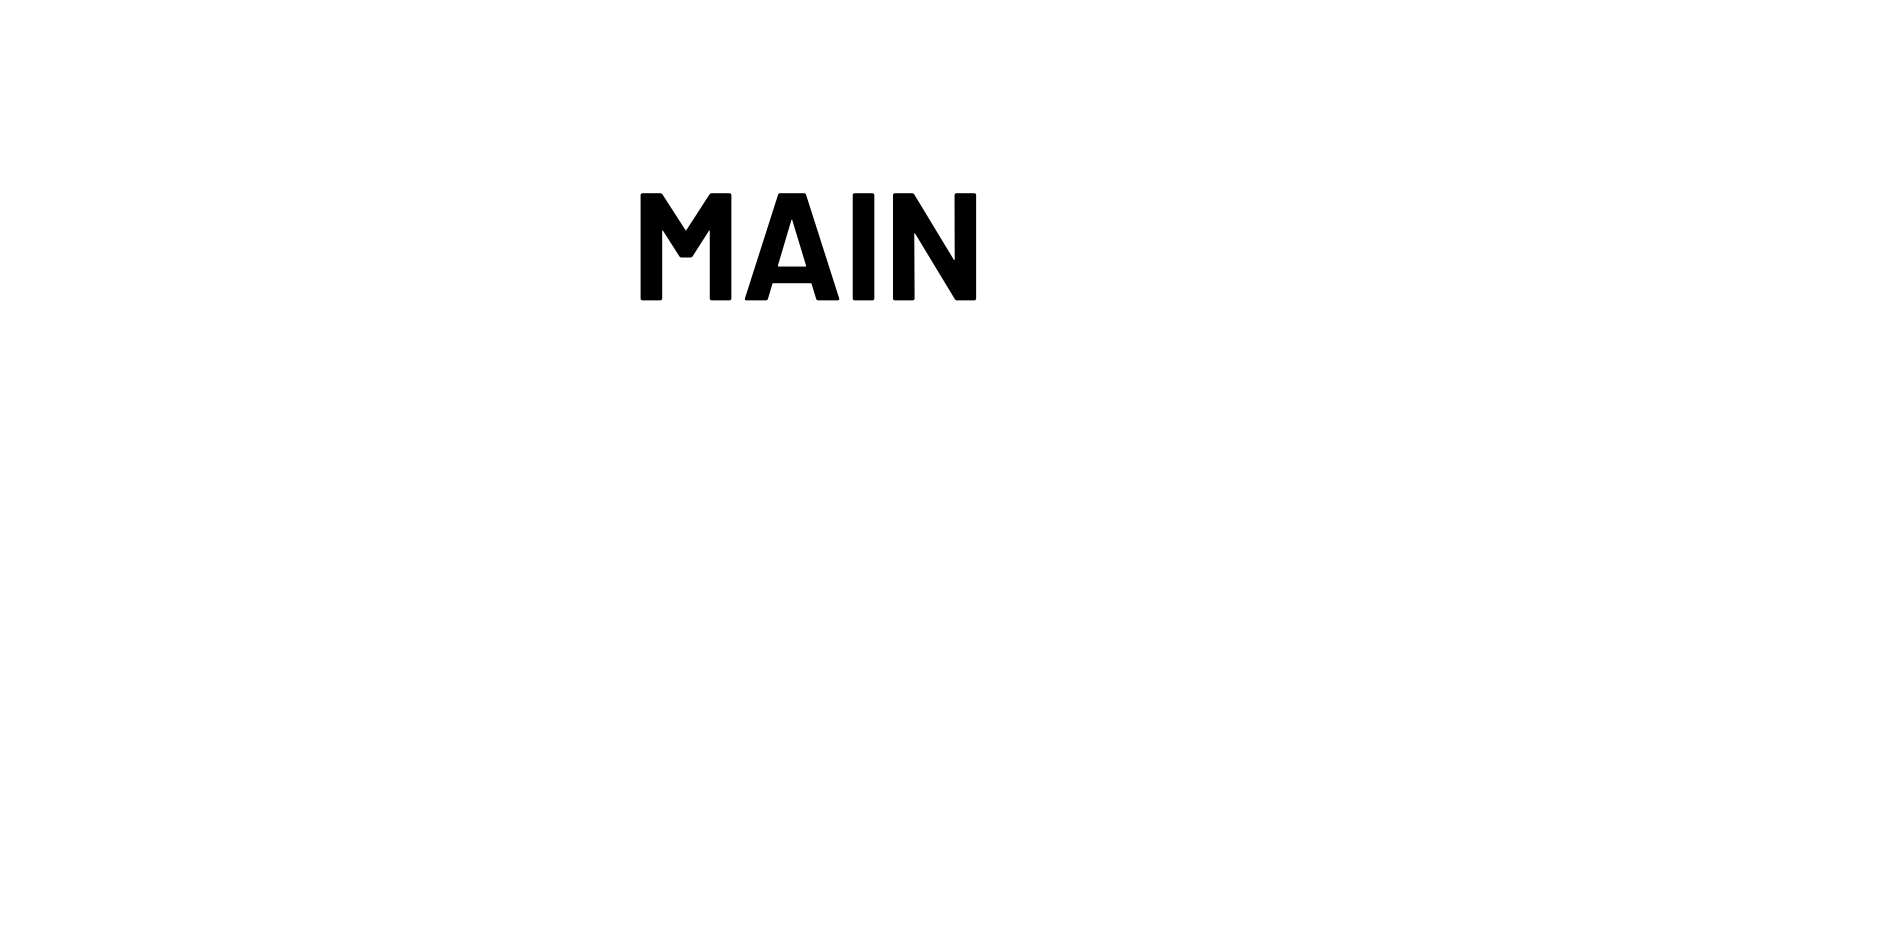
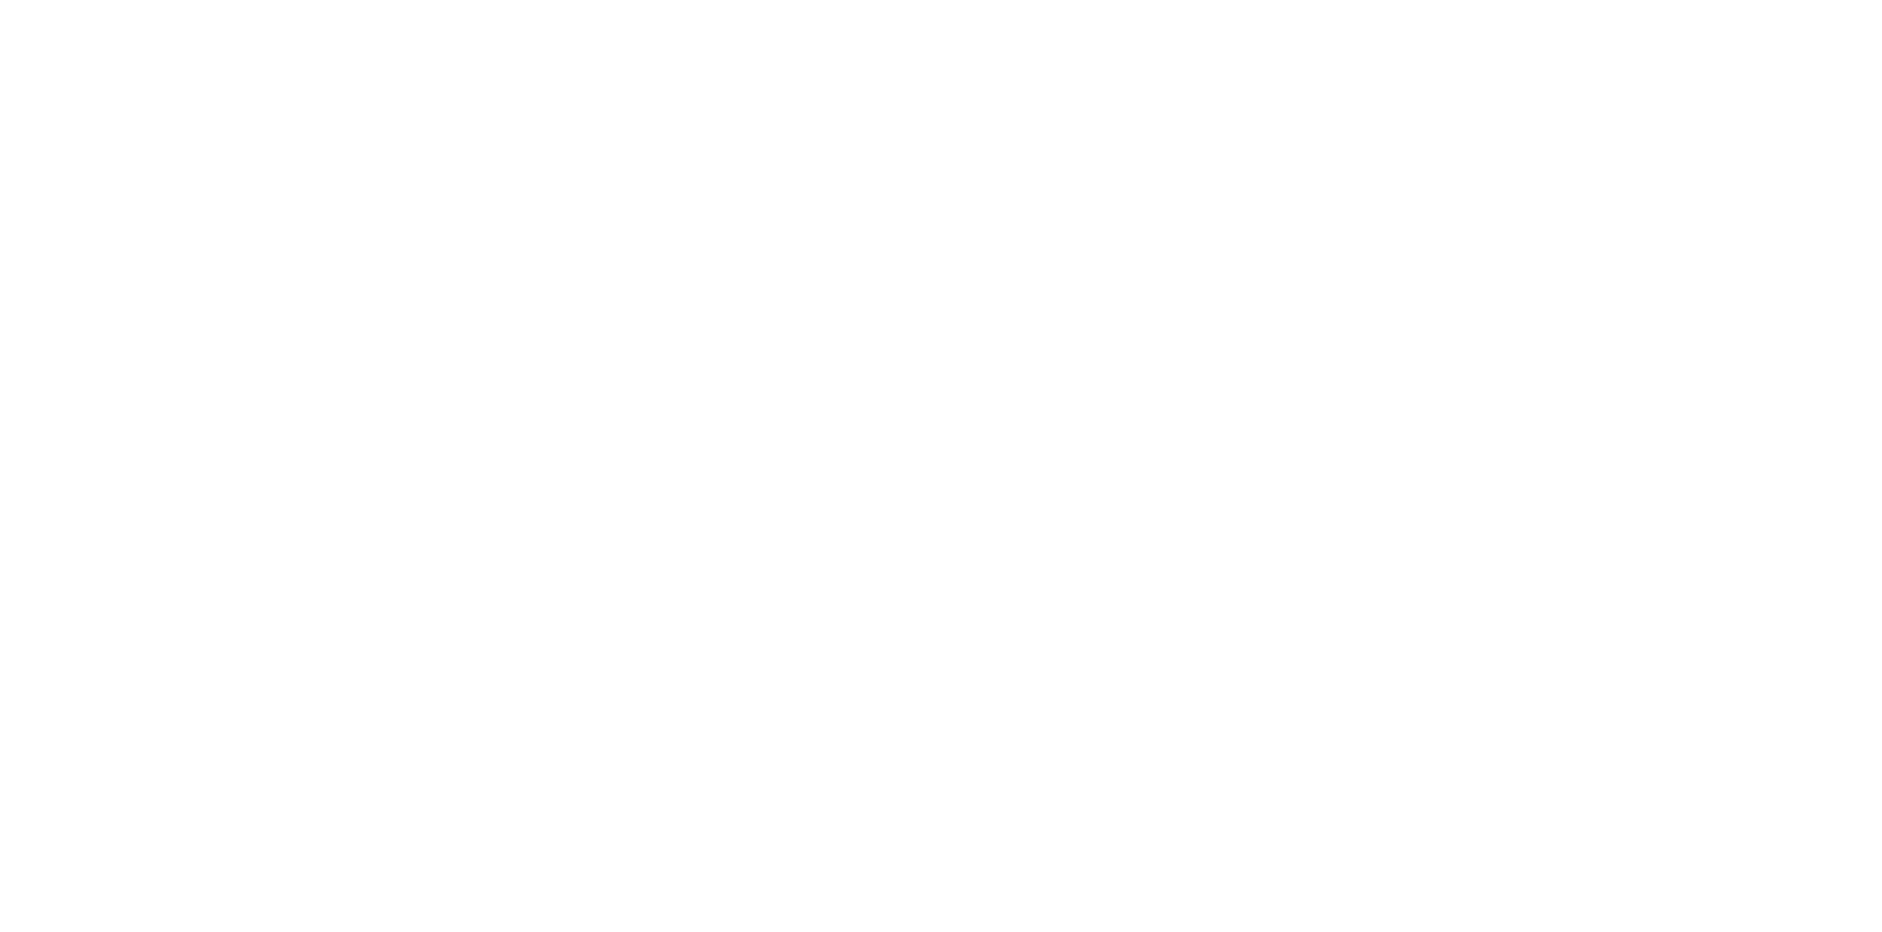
text: MAIN (808, 246) -> none

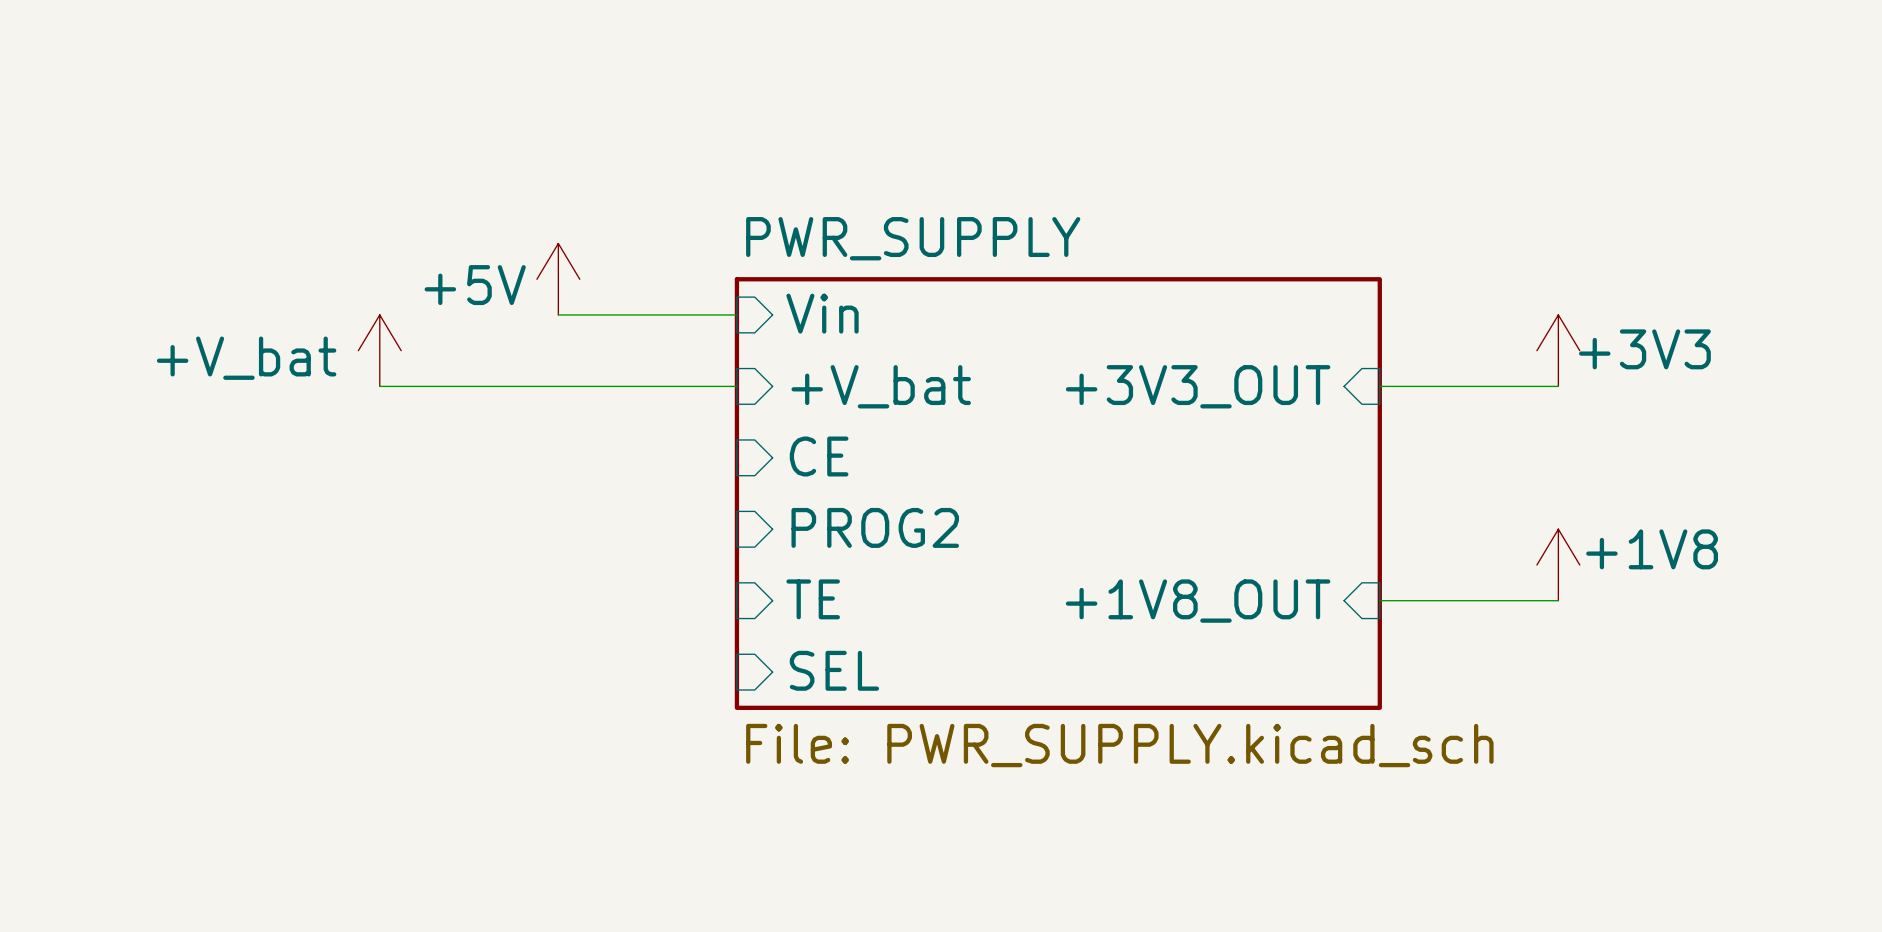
power symbol: none -> +5V (558, 279)
sheet pin: none -> Vin (822, 313)
wire: none -> (558, 314) (736, 314)
power symbol: none -> +V_bat (379, 350)
power symbol: none -> +3V3 (1558, 350)
wire: none -> (379, 386) (736, 386)
wire: none -> (1379, 386) (1558, 386)
sheet pin: none -> +V_bat (881, 386)
sheet pin: none -> +3V3_OUT (1198, 386)
sheet pin: none -> CE (819, 456)
sheet PWR_SUPPLY: none -> File: PWR_SUPPLY.kicad_sch (1058, 493)
sheet pin: none -> PROG2 (875, 527)
power symbol: none -> +1V8 (1558, 564)
sheet pin: none -> TE (813, 599)
wire: none -> (1379, 600) (1558, 600)
sheet pin: none -> +1V8_OUT (1198, 601)
sheet pin: none -> SEL (834, 670)

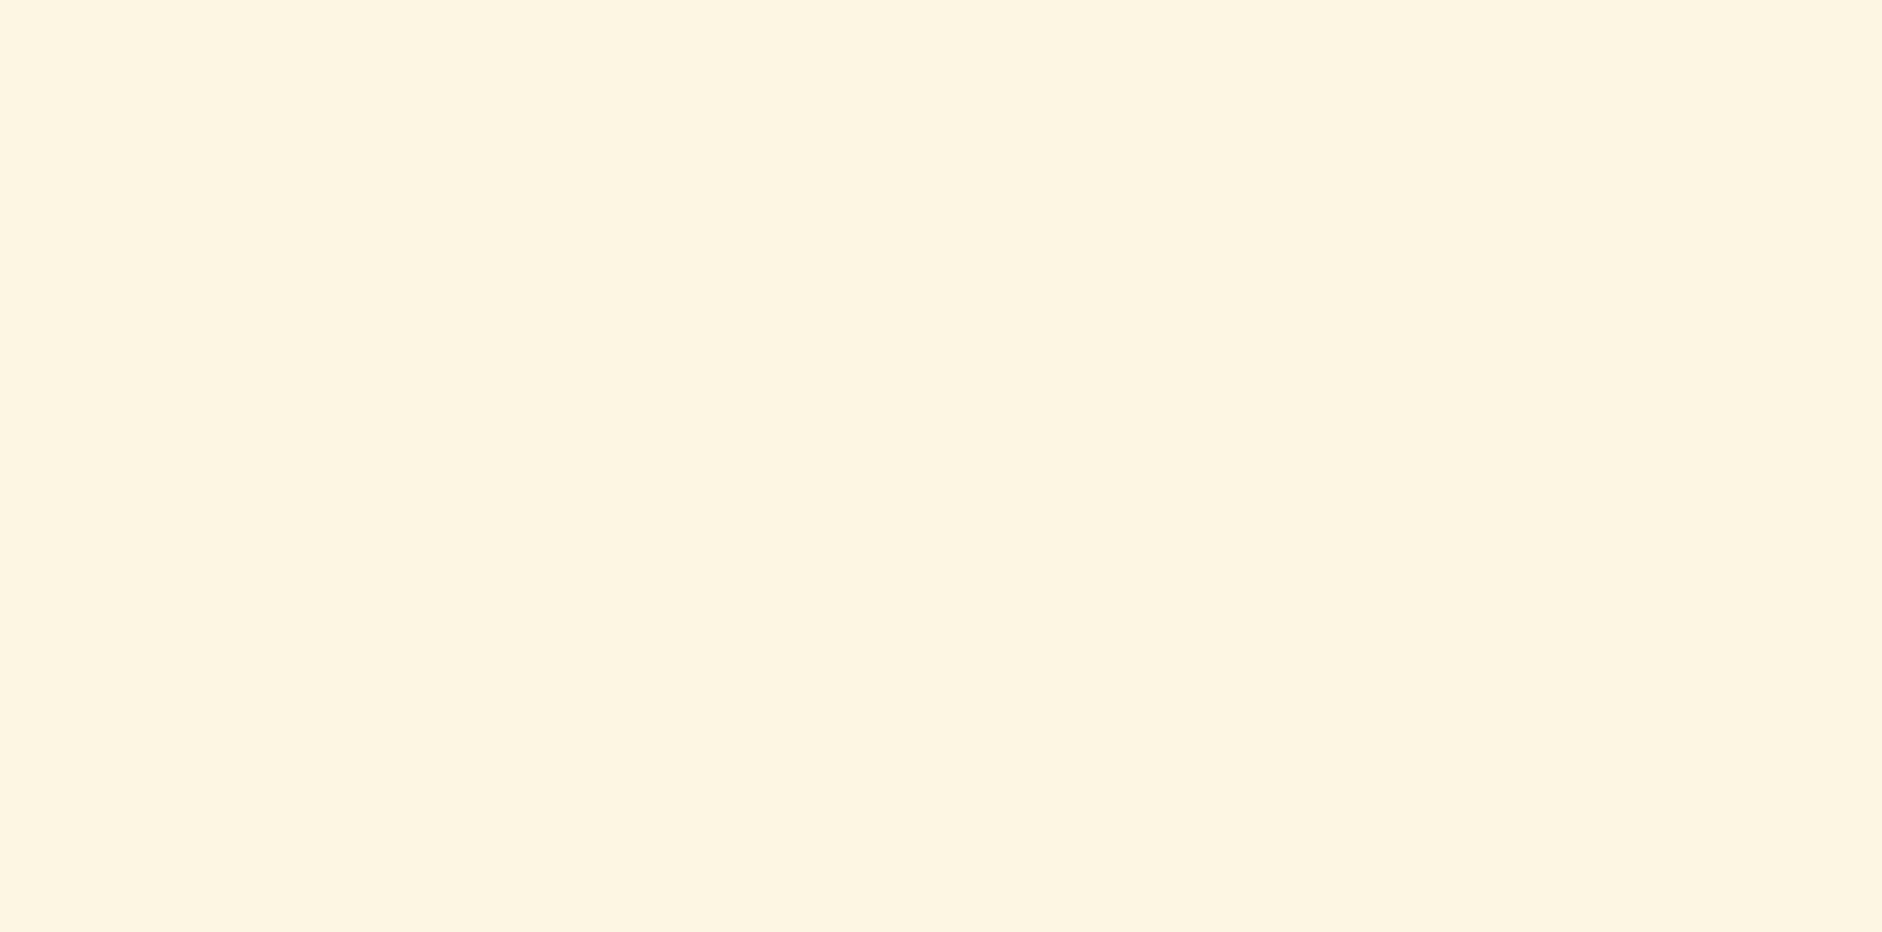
power symbol: +5V (558, 279) -> none
sheet pin: Vin (822, 313) -> none
wire: (558, 314) (736, 314) -> none
power symbol: +V_bat (379, 350) -> none
power symbol: +3V3 (1558, 350) -> none
wire: (379, 386) (736, 386) -> none
sheet pin: +V_bat (881, 386) -> none
sheet pin: +3V3_OUT (1198, 386) -> none
wire: (1379, 386) (1558, 386) -> none
sheet pin: CE (819, 456) -> none
sheet PWR_SUPPLY: File: PWR_SUPPLY.kicad_sch (1058, 493) -> none
sheet pin: PROG2 (875, 527) -> none
power symbol: +1V8 (1558, 564) -> none
sheet pin: TE (813, 599) -> none
wire: (1379, 600) (1558, 600) -> none
sheet pin: +1V8_OUT (1198, 601) -> none
sheet pin: SEL (834, 670) -> none

